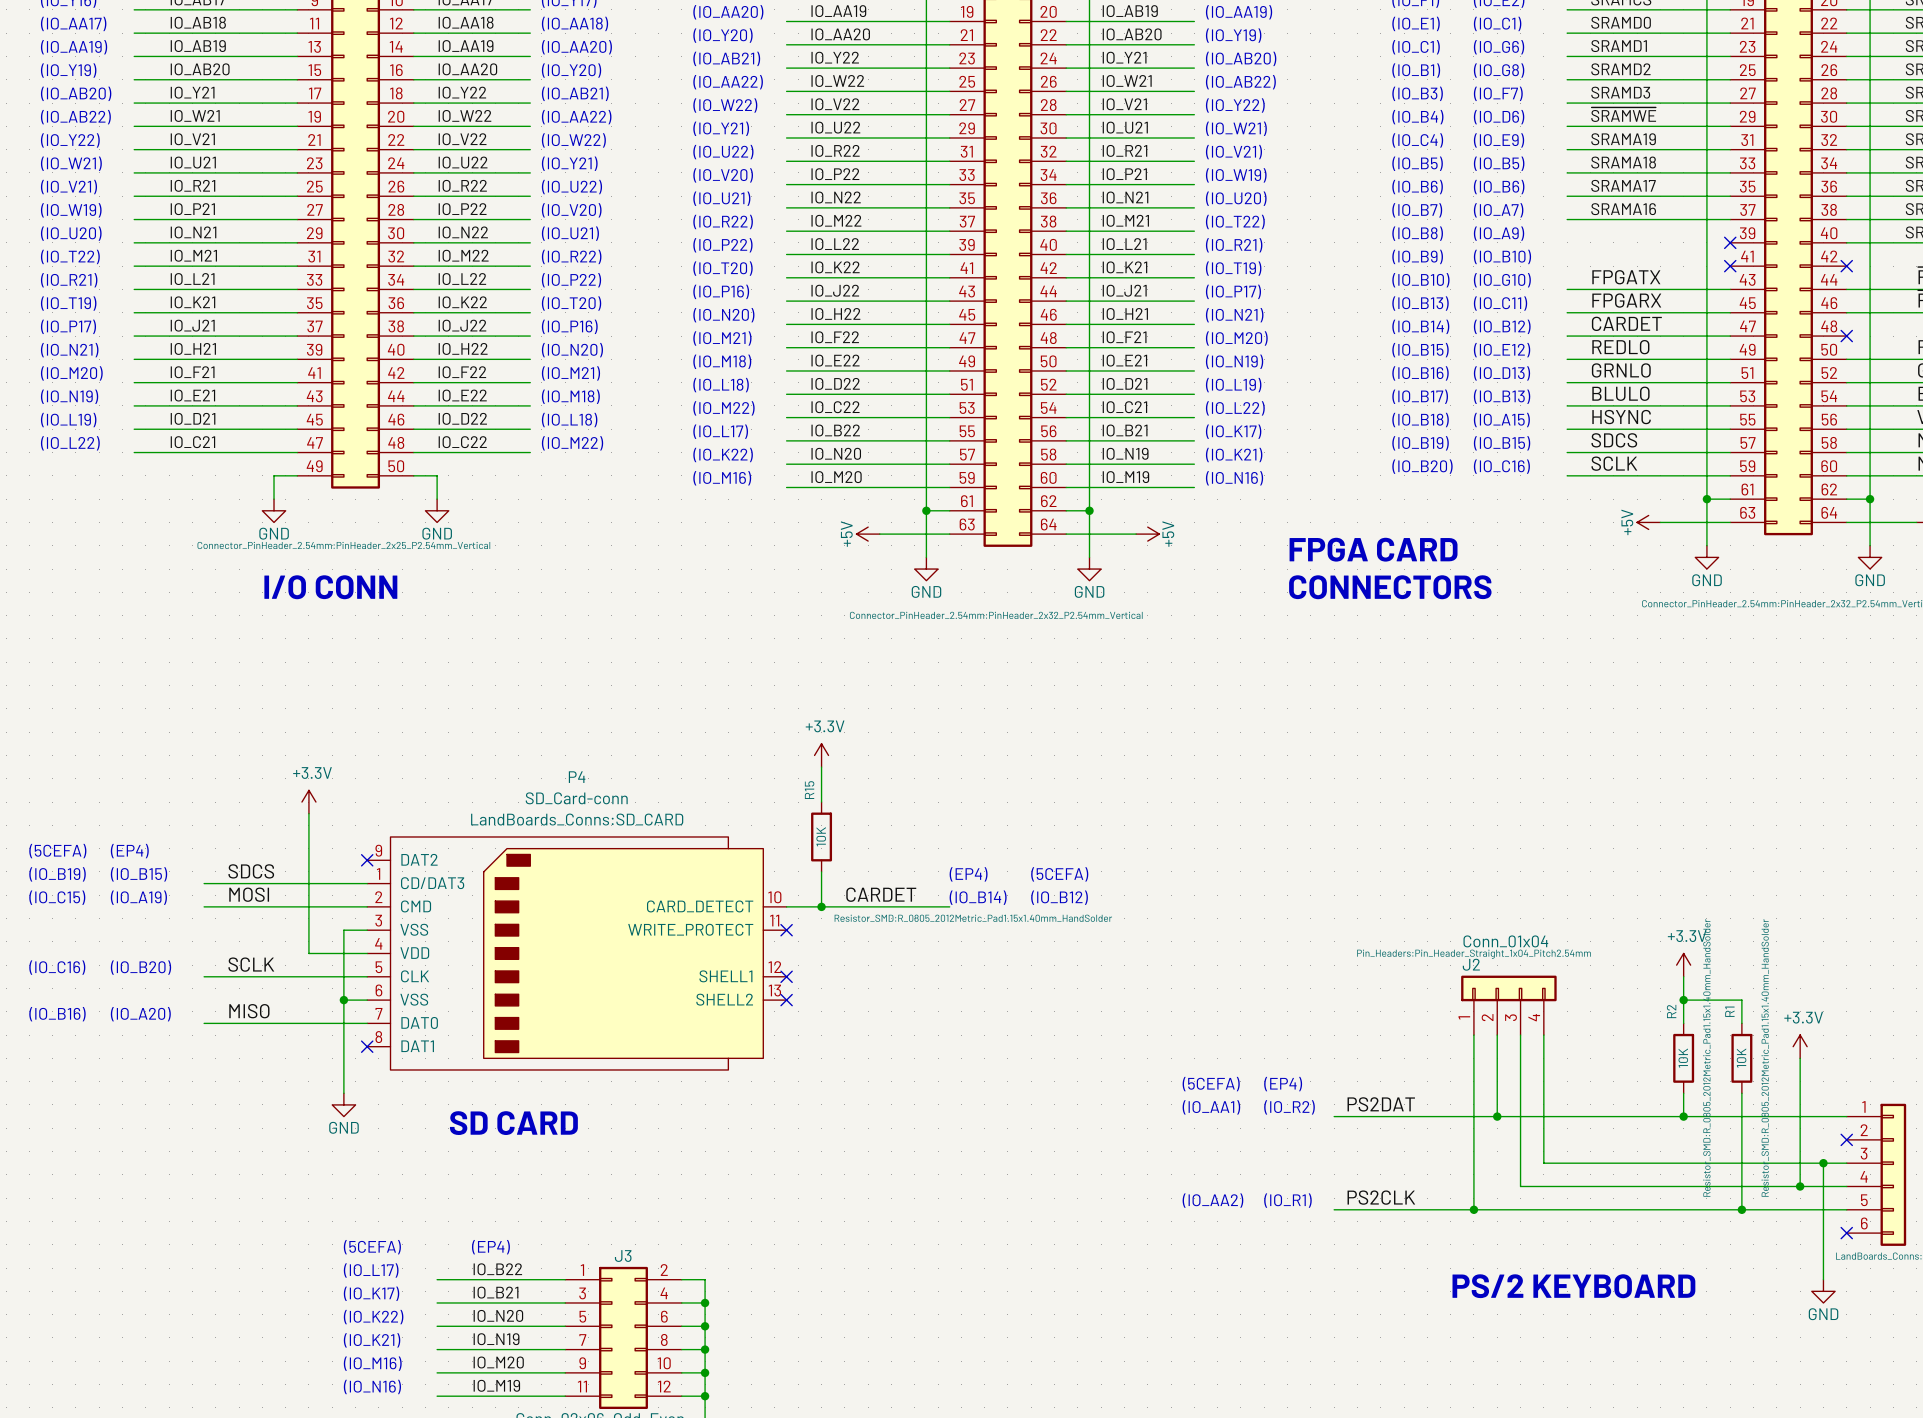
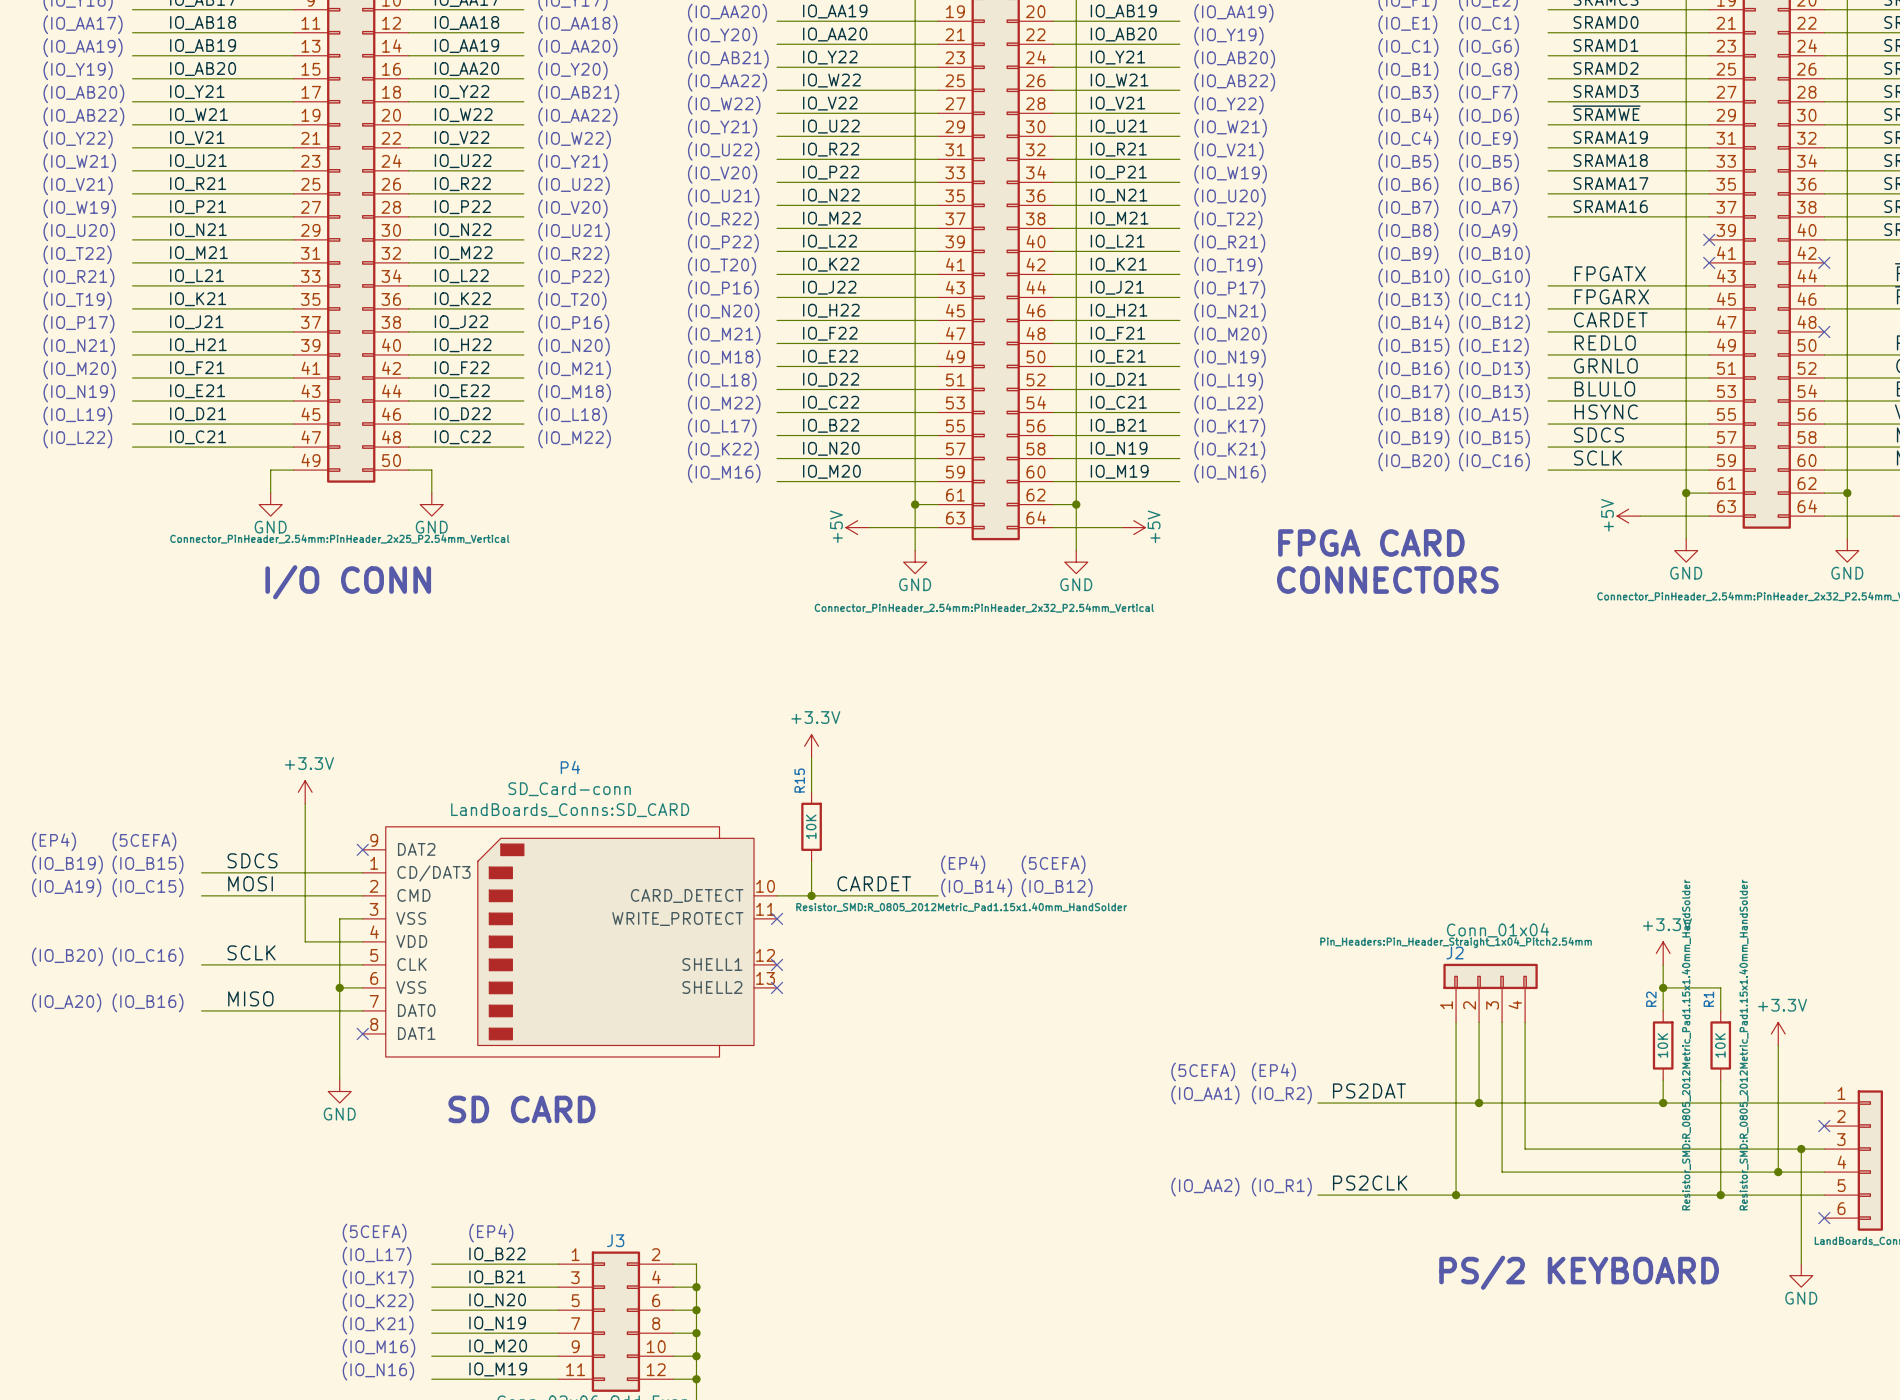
text: (5CEFA) (57, 851) -> (EP4) (54, 841)
text: (EP4) (129, 851) -> (5CEFA) (144, 841)
text: (IO_C15) (57, 897) -> (IO_A19) (66, 887)
text: (IO_A19) (138, 897) -> (IO_C15) (148, 887)
text: (IO_C16) (57, 967) -> (IO_B20) (67, 956)
text: (IO_B20) (140, 967) -> (IO_C16) (148, 956)
text: (IO_B16) (57, 1014) -> (IO_A20) (66, 1002)
text: (IO_A20) (140, 1014) -> (IO_B16) (148, 1002)

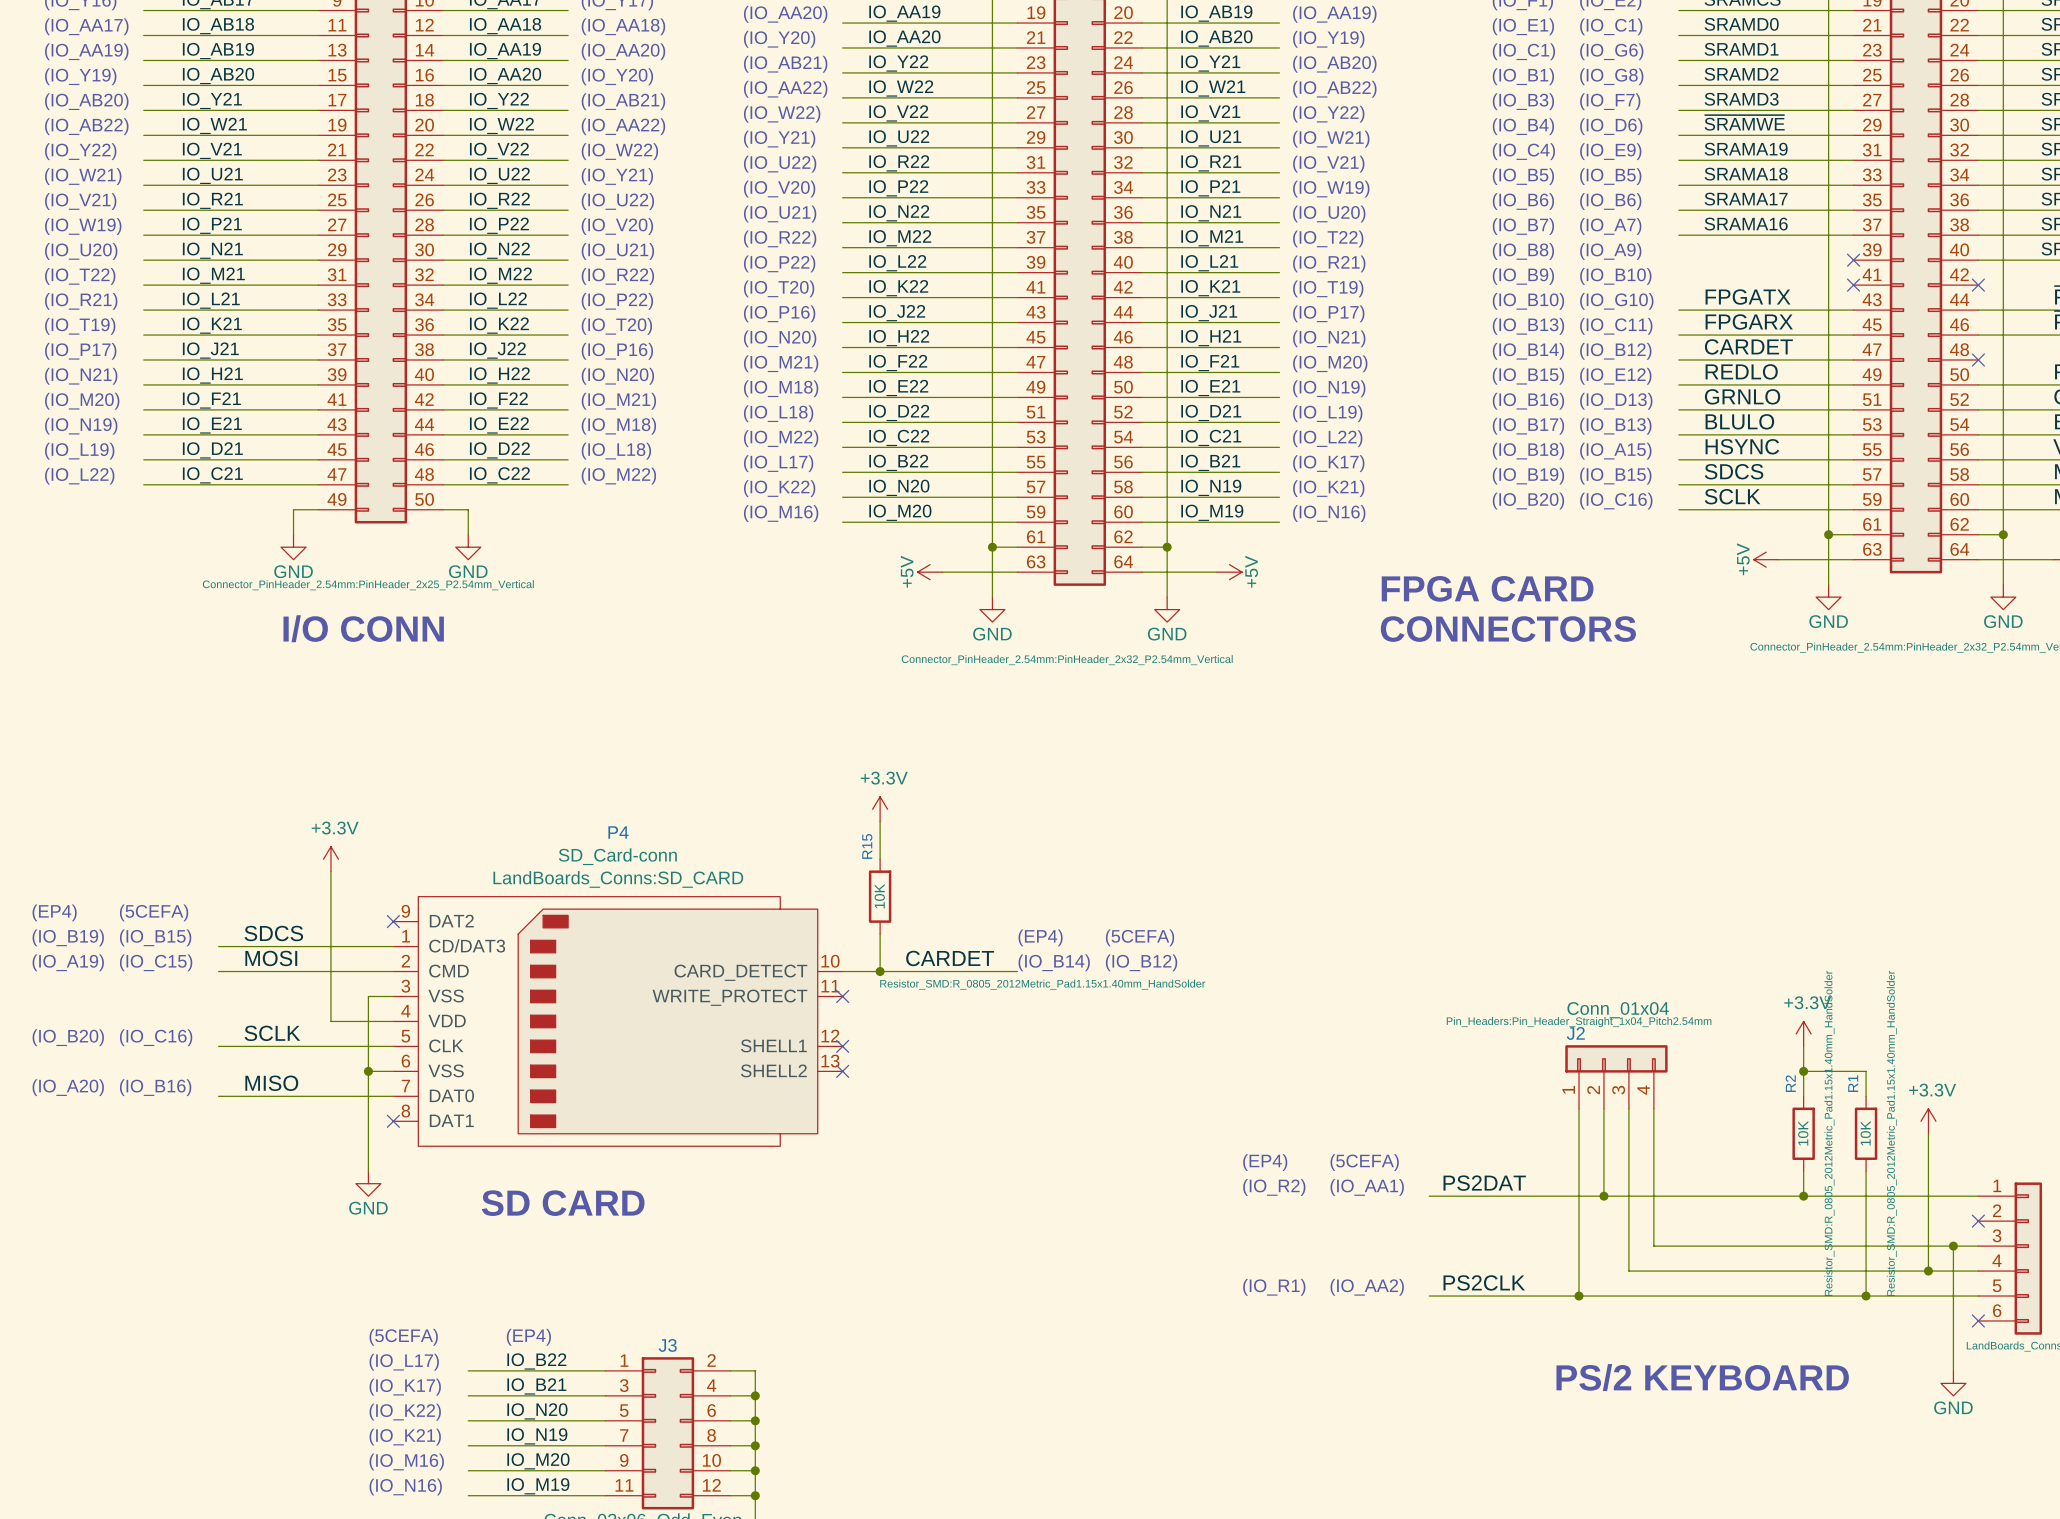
text position: (5CEFA) (1203, 1071) -> (5CEFA) (1364, 1162)
text position: (EP4) (1273, 1071) -> (EP4) (1265, 1162)
text position: (IO_AA1) (1205, 1094) -> (IO_AA1) (1367, 1187)
text position: (IO_R2) (1281, 1094) -> (IO_R2) (1274, 1187)
text position: (IO_AA2) (1205, 1187) -> (IO_AA2) (1367, 1287)
text position: (IO_R1) (1281, 1187) -> (IO_R1) (1274, 1287)

